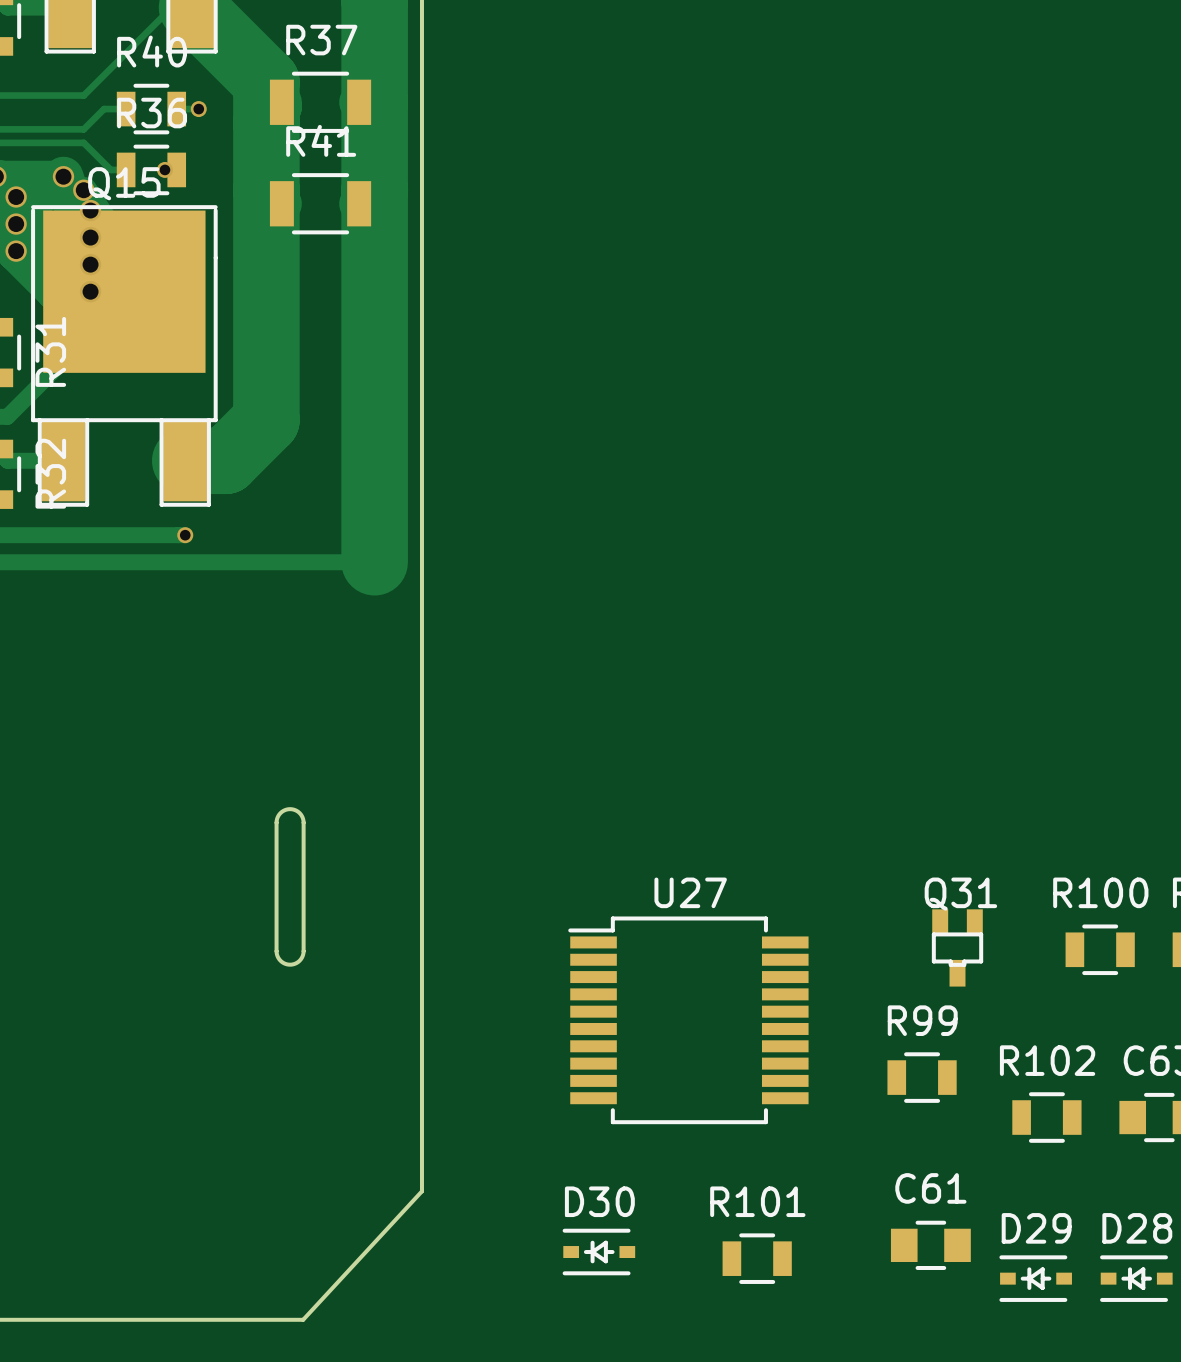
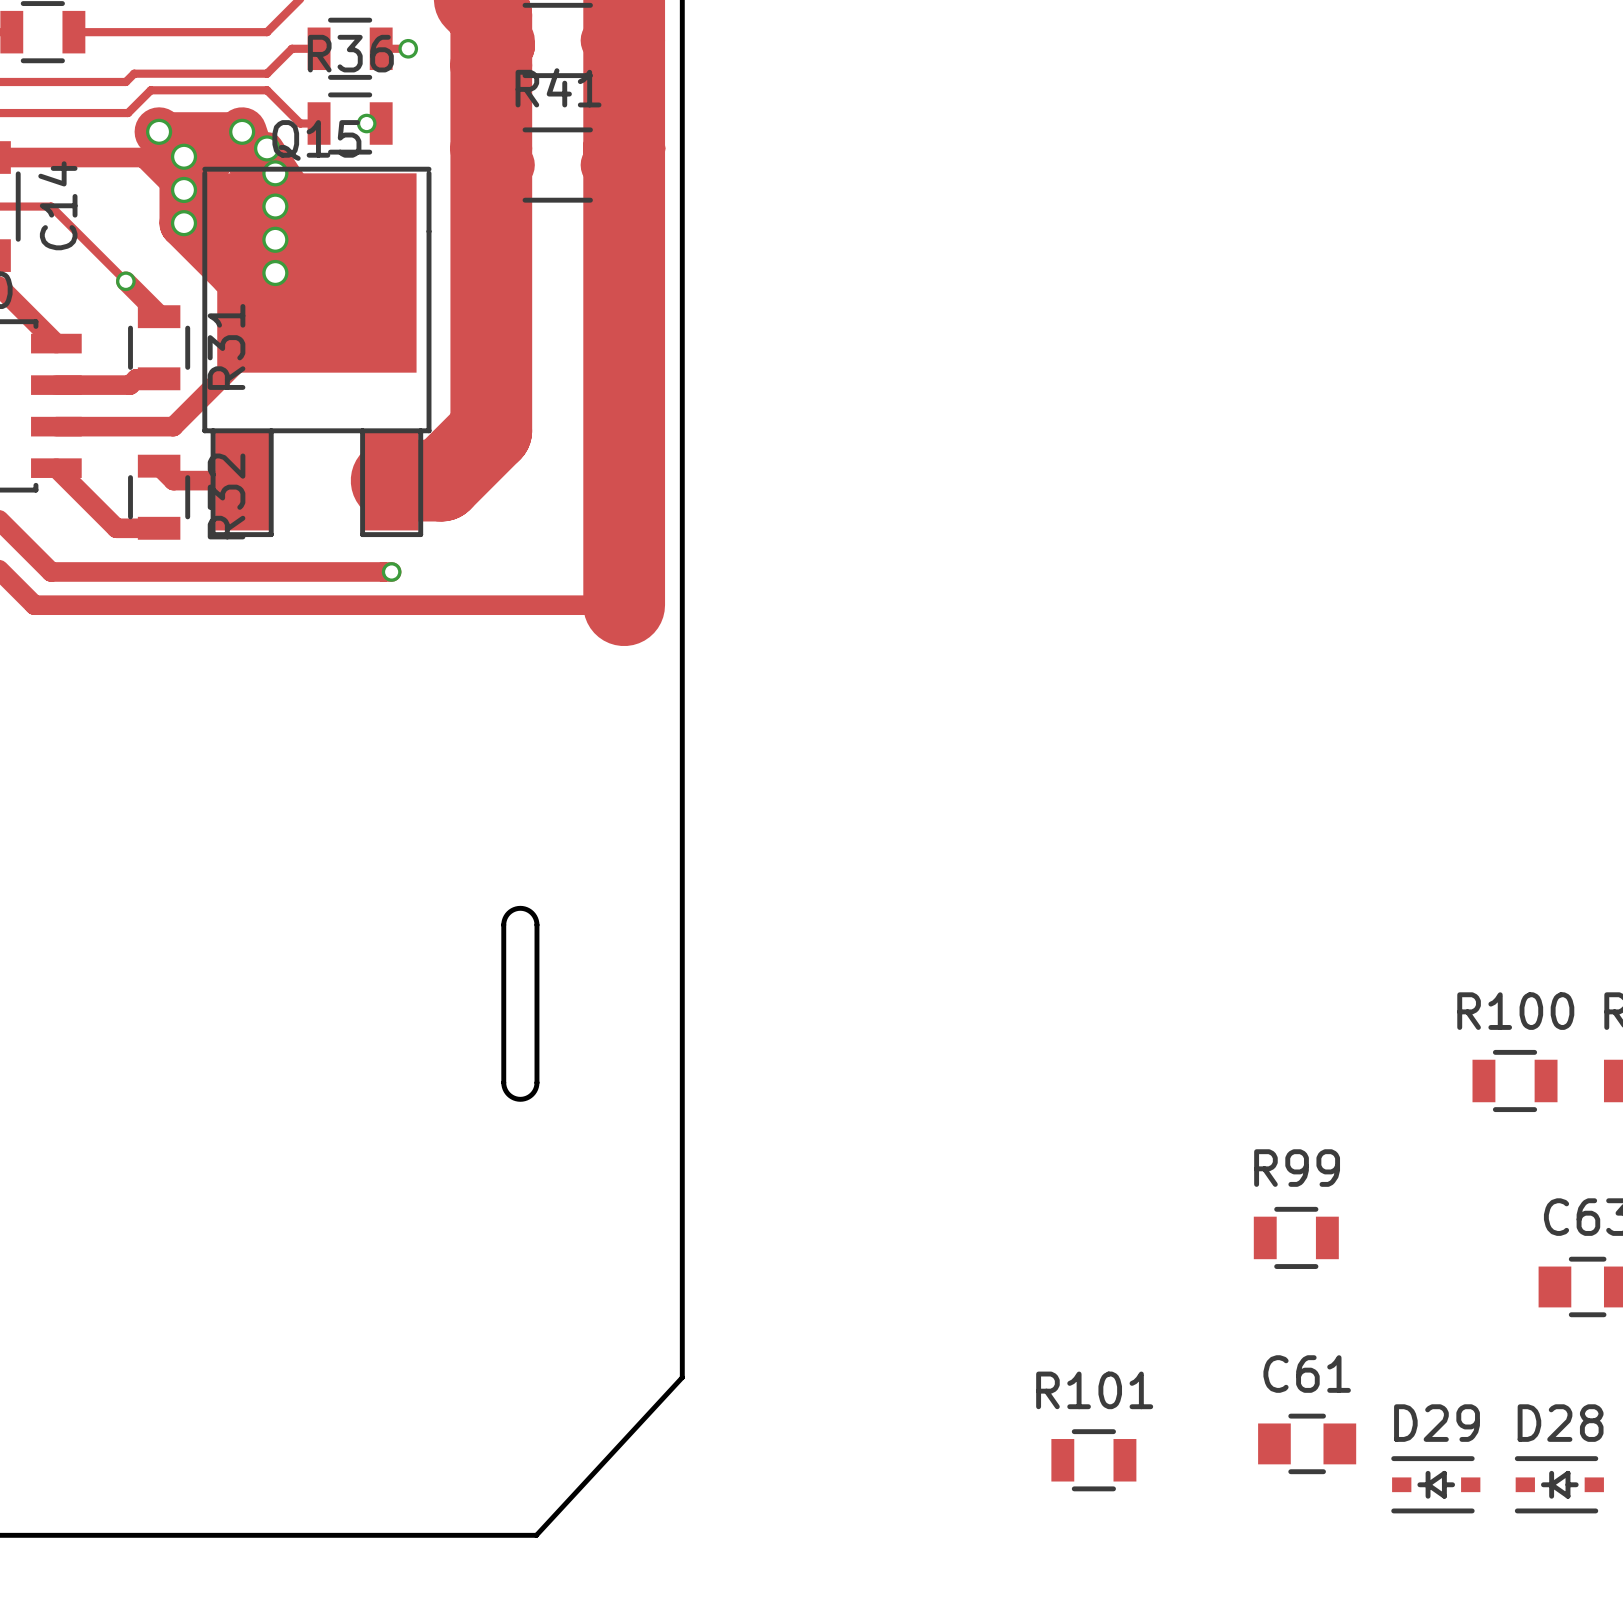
Q31: (957, 947) -> none
U27: (688, 1020) -> none
R102: (1046, 1117) -> none
D30: (598, 1252) -> none

